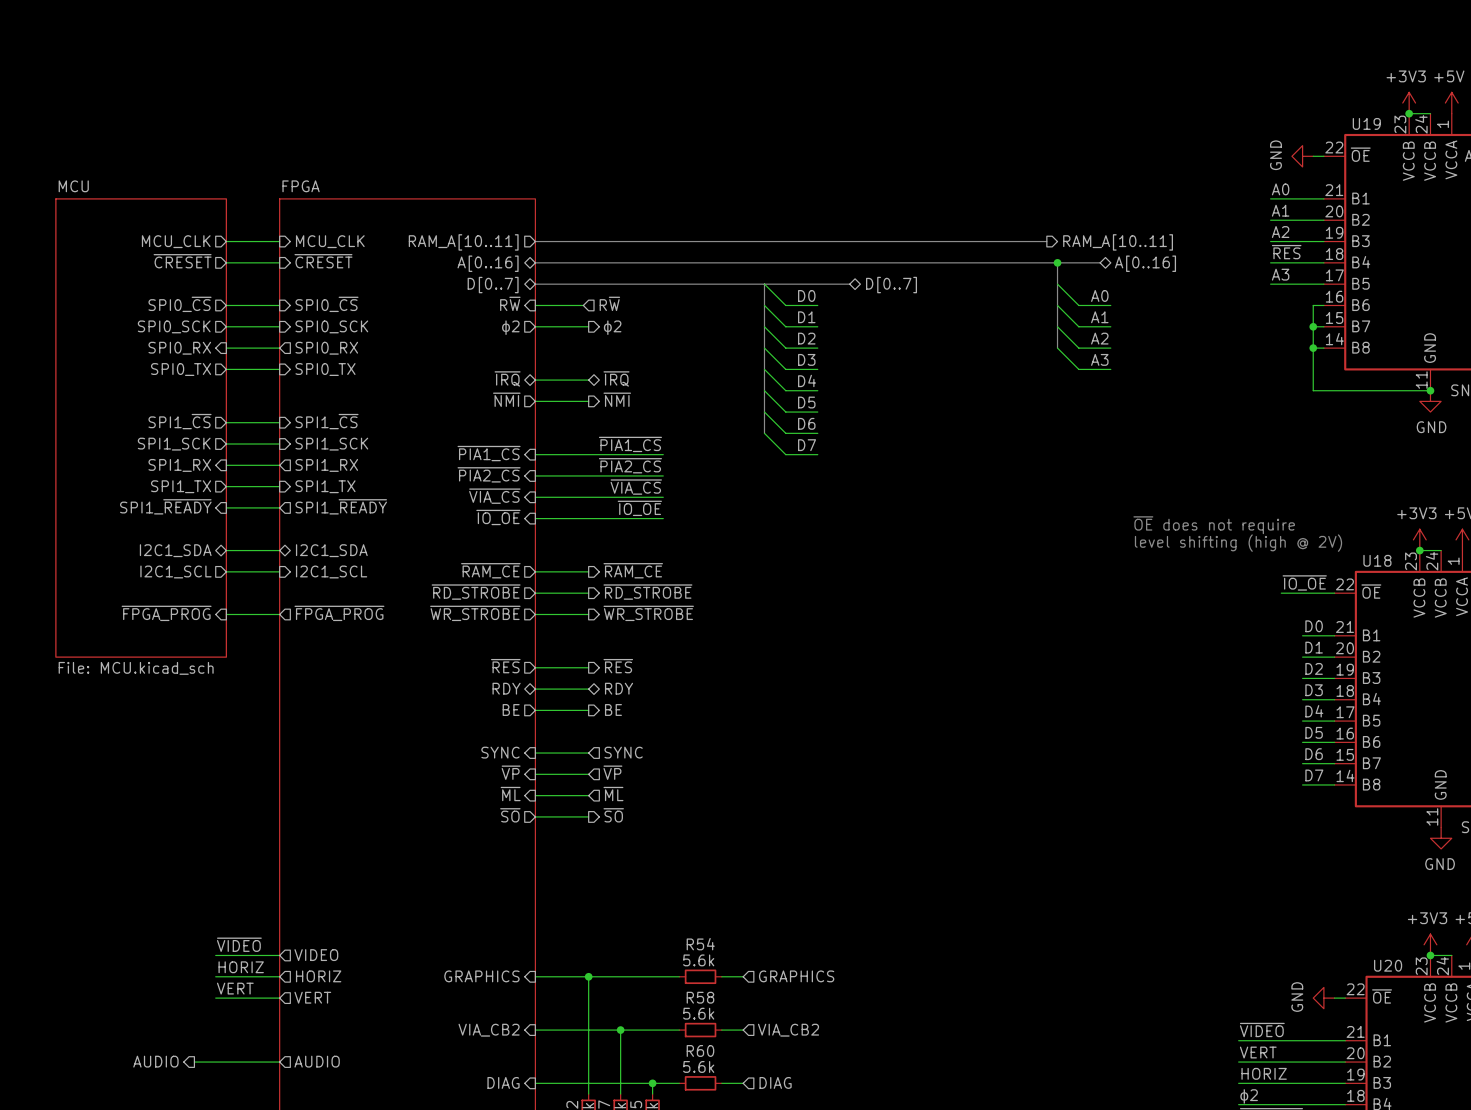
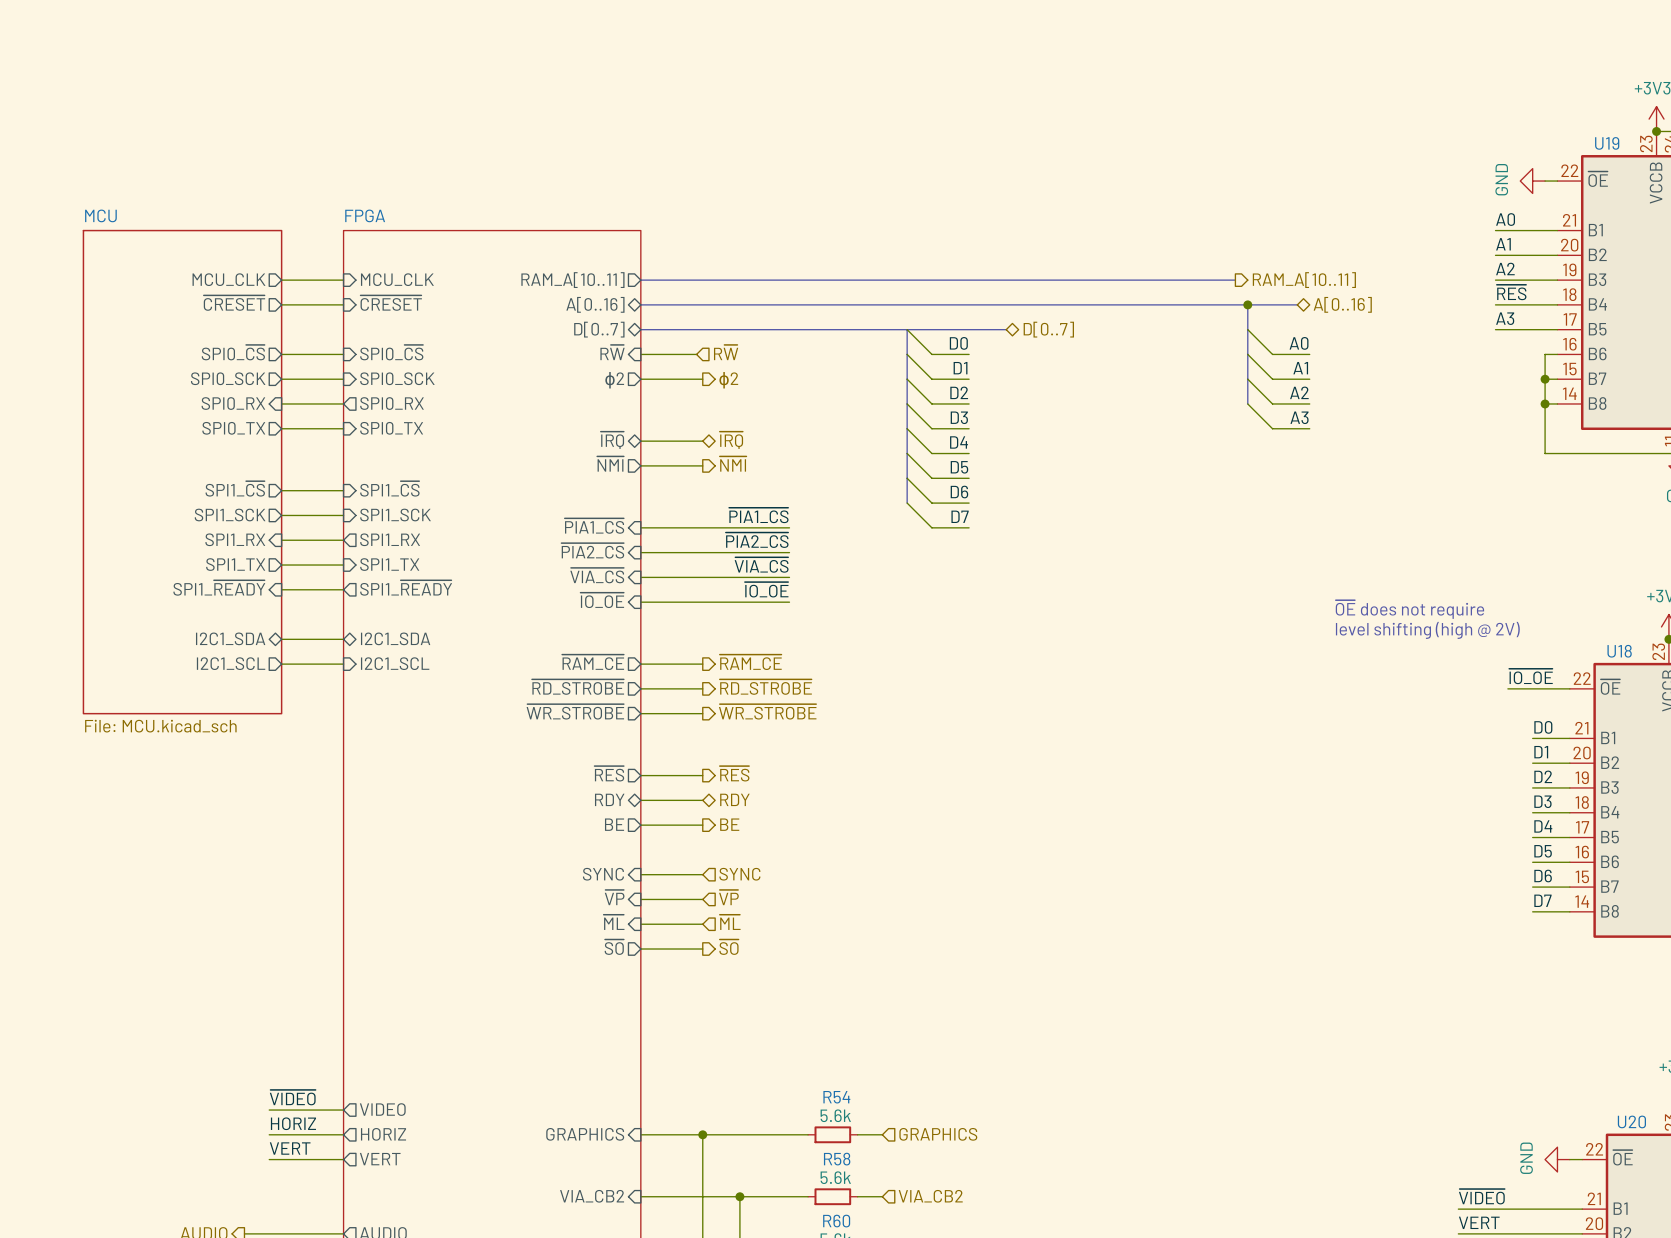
sheet MCU: none -> File: MCU.kicad_sch (182, 472)
sheet MCU: File: MCU.kicad_sch (141, 428) -> none
sheet pin: ~{FPGA_PROG} (166, 613) -> none
sheet pin: ~{FPGA_PROG} (339, 613) -> none
wire: (226, 614) (279, 614) -> none

